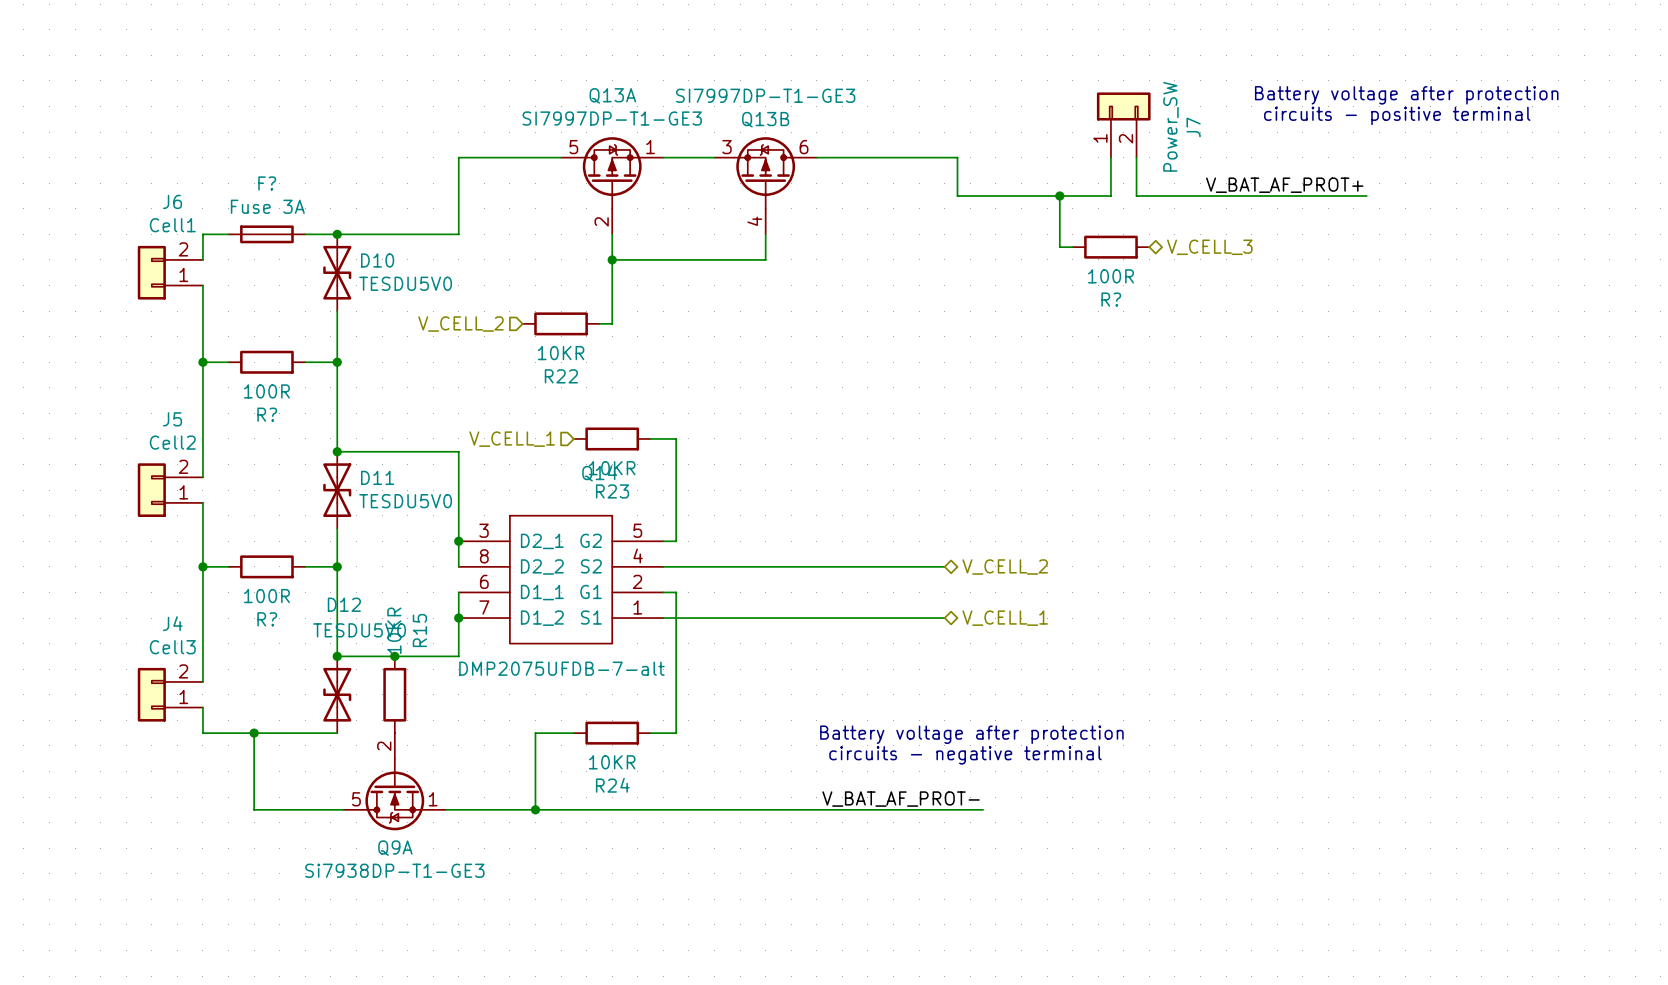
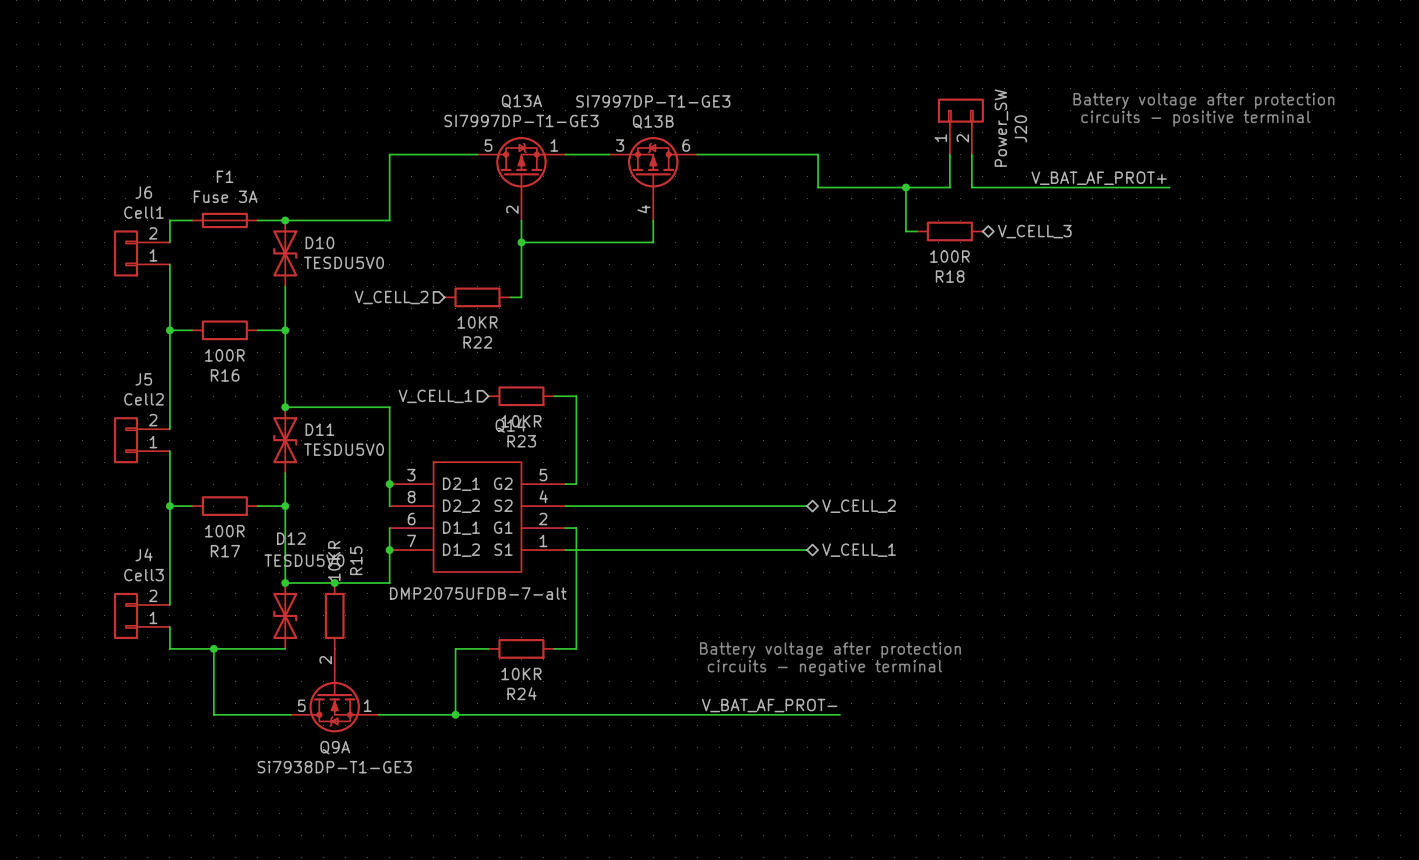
J7 name: J7 (1193, 127) -> J20 (1020, 128)
F? name: F? (267, 183) -> F1 (225, 176)
R? name: R? (1111, 299) -> R18 (950, 276)
R? name: R? (267, 414) -> R16 (225, 375)
R? name: R? (267, 619) -> R17 (225, 551)

